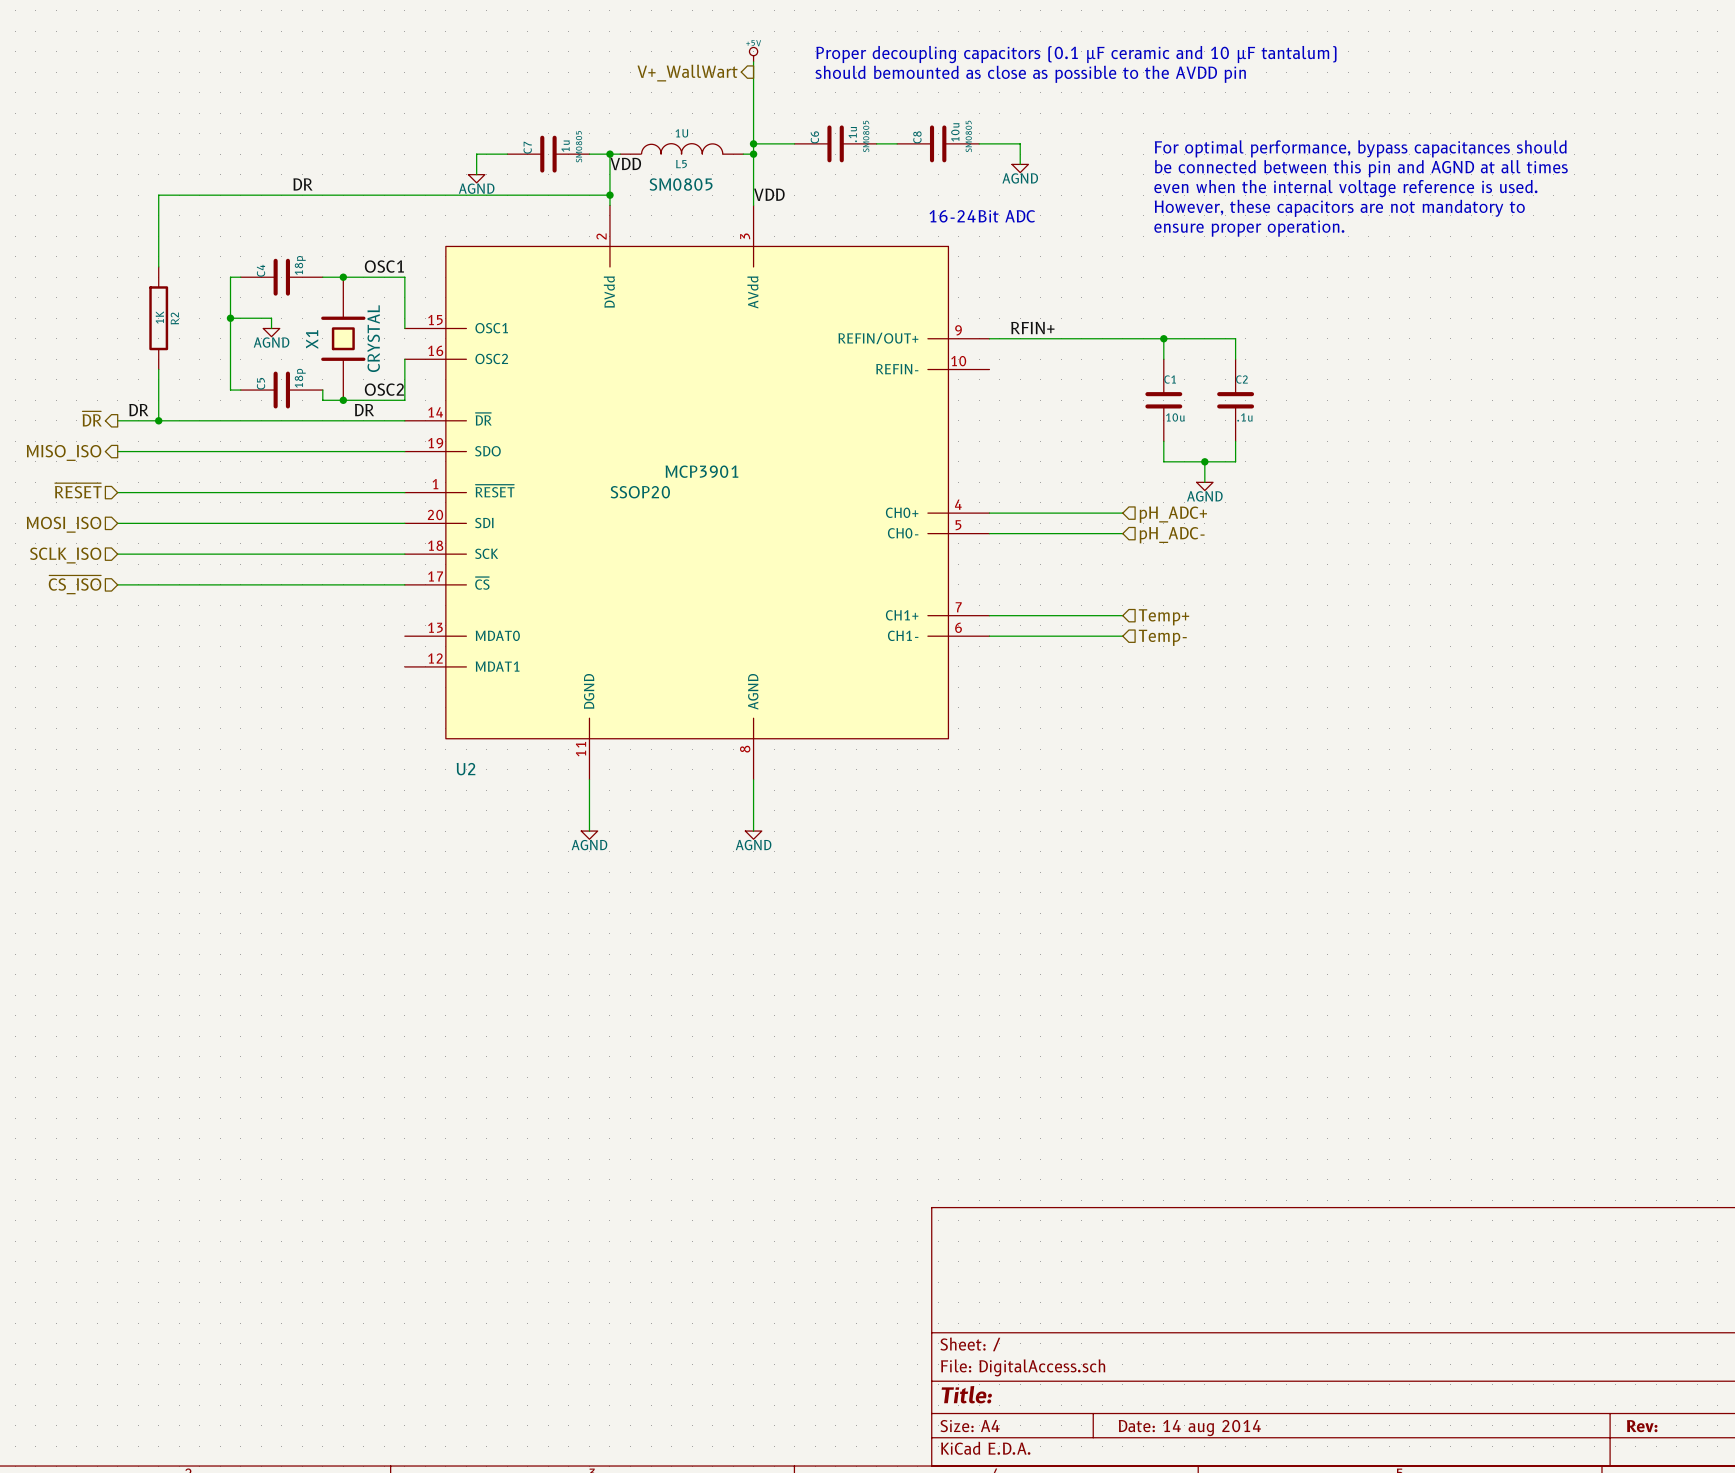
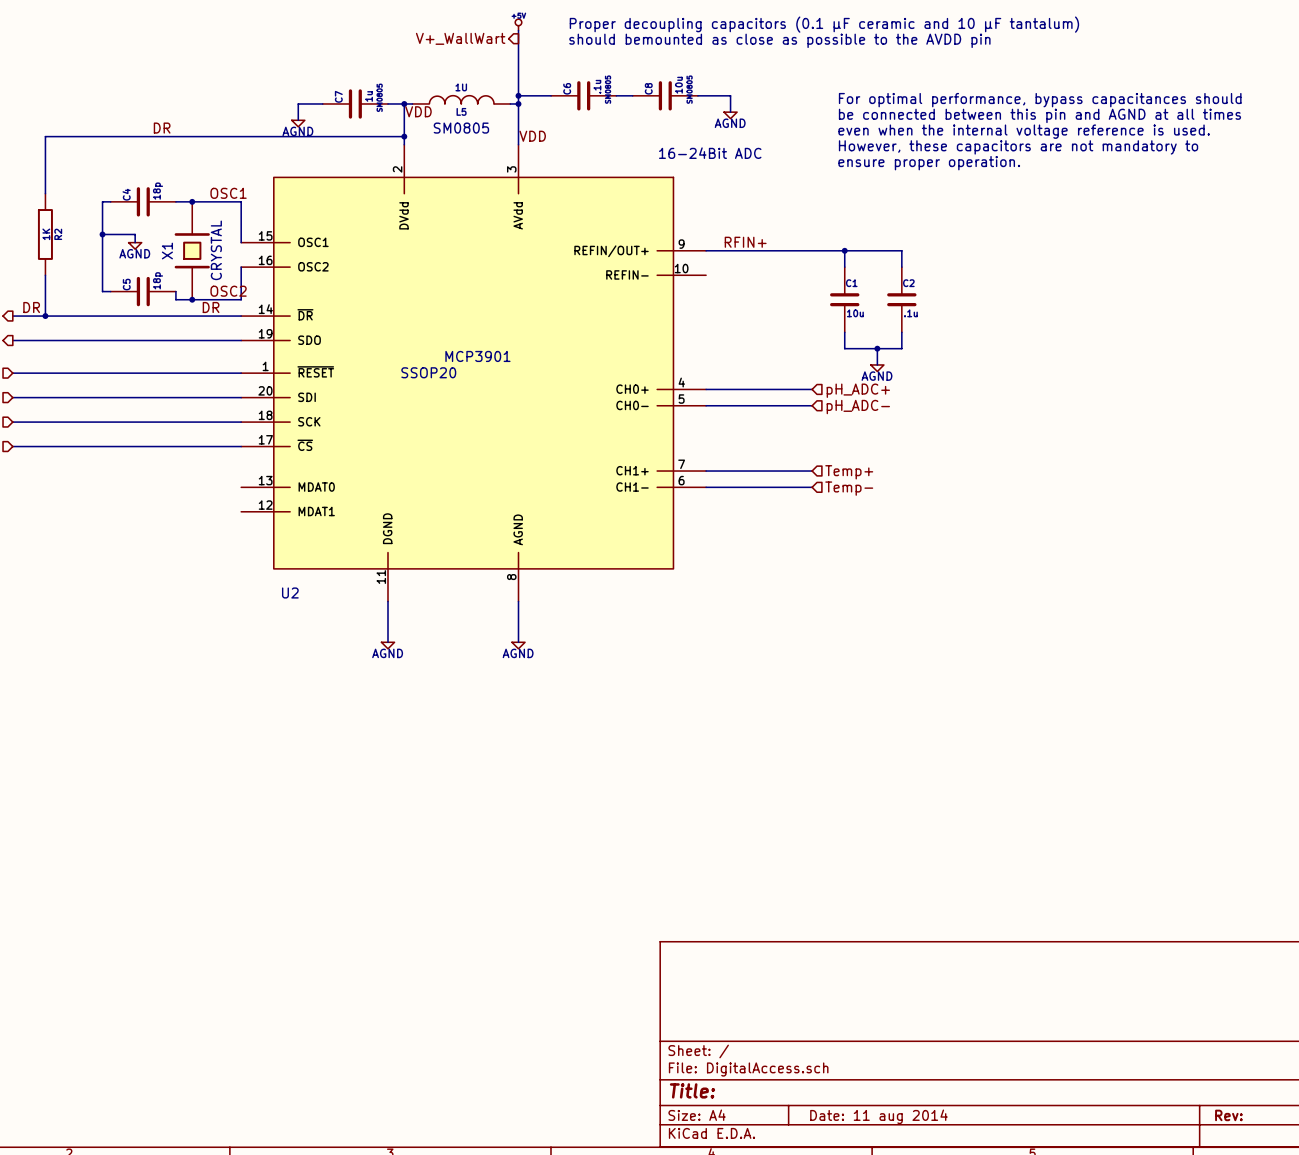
title block: Date: 14 aug 2014 (1189, 1428) -> Date: 11 aug 2014 (878, 1116)

